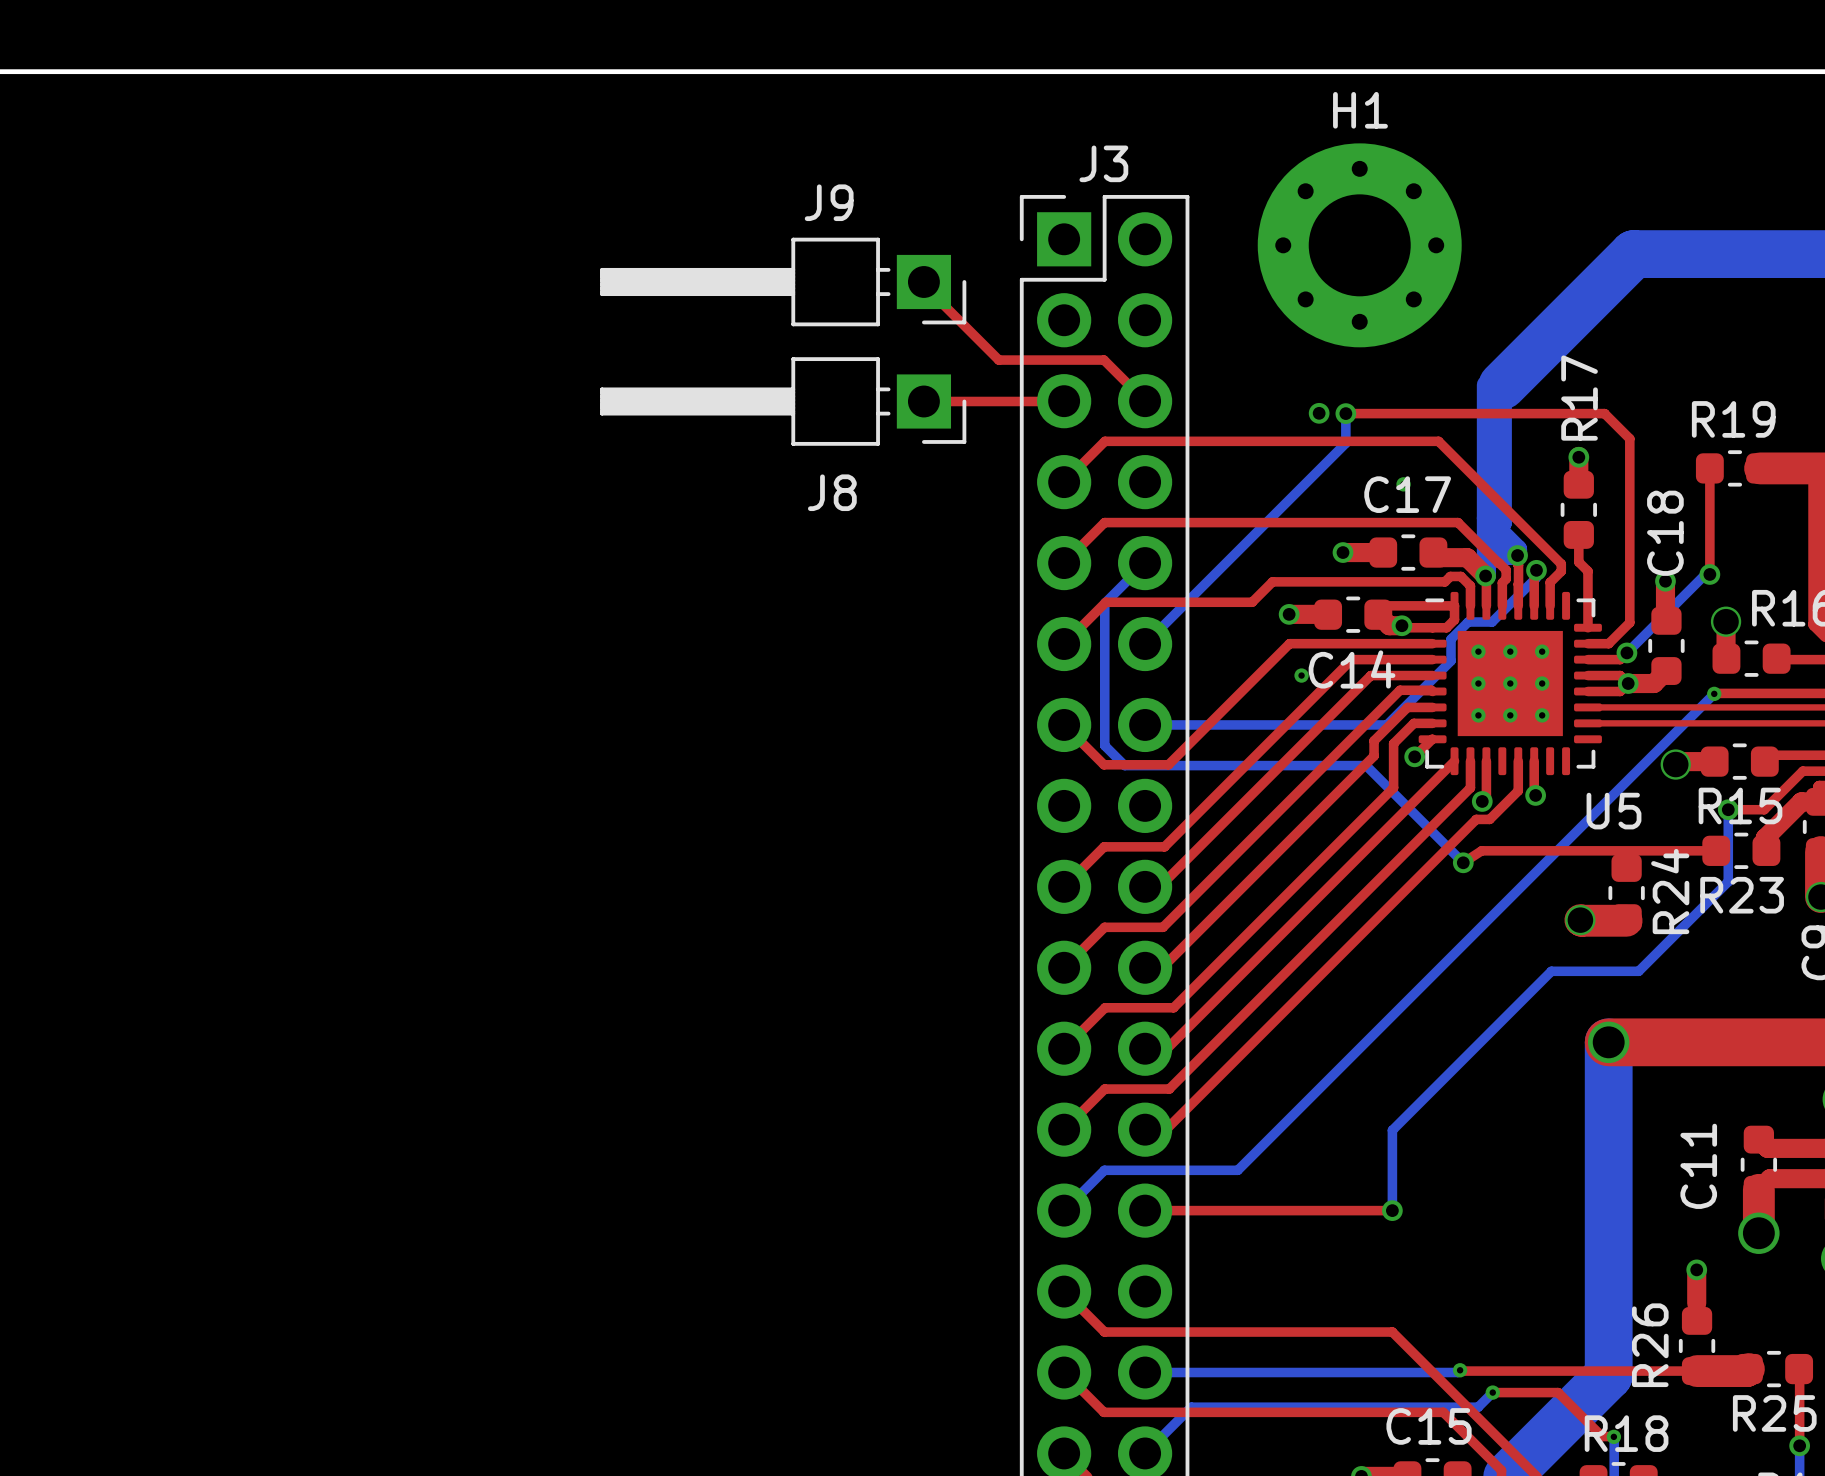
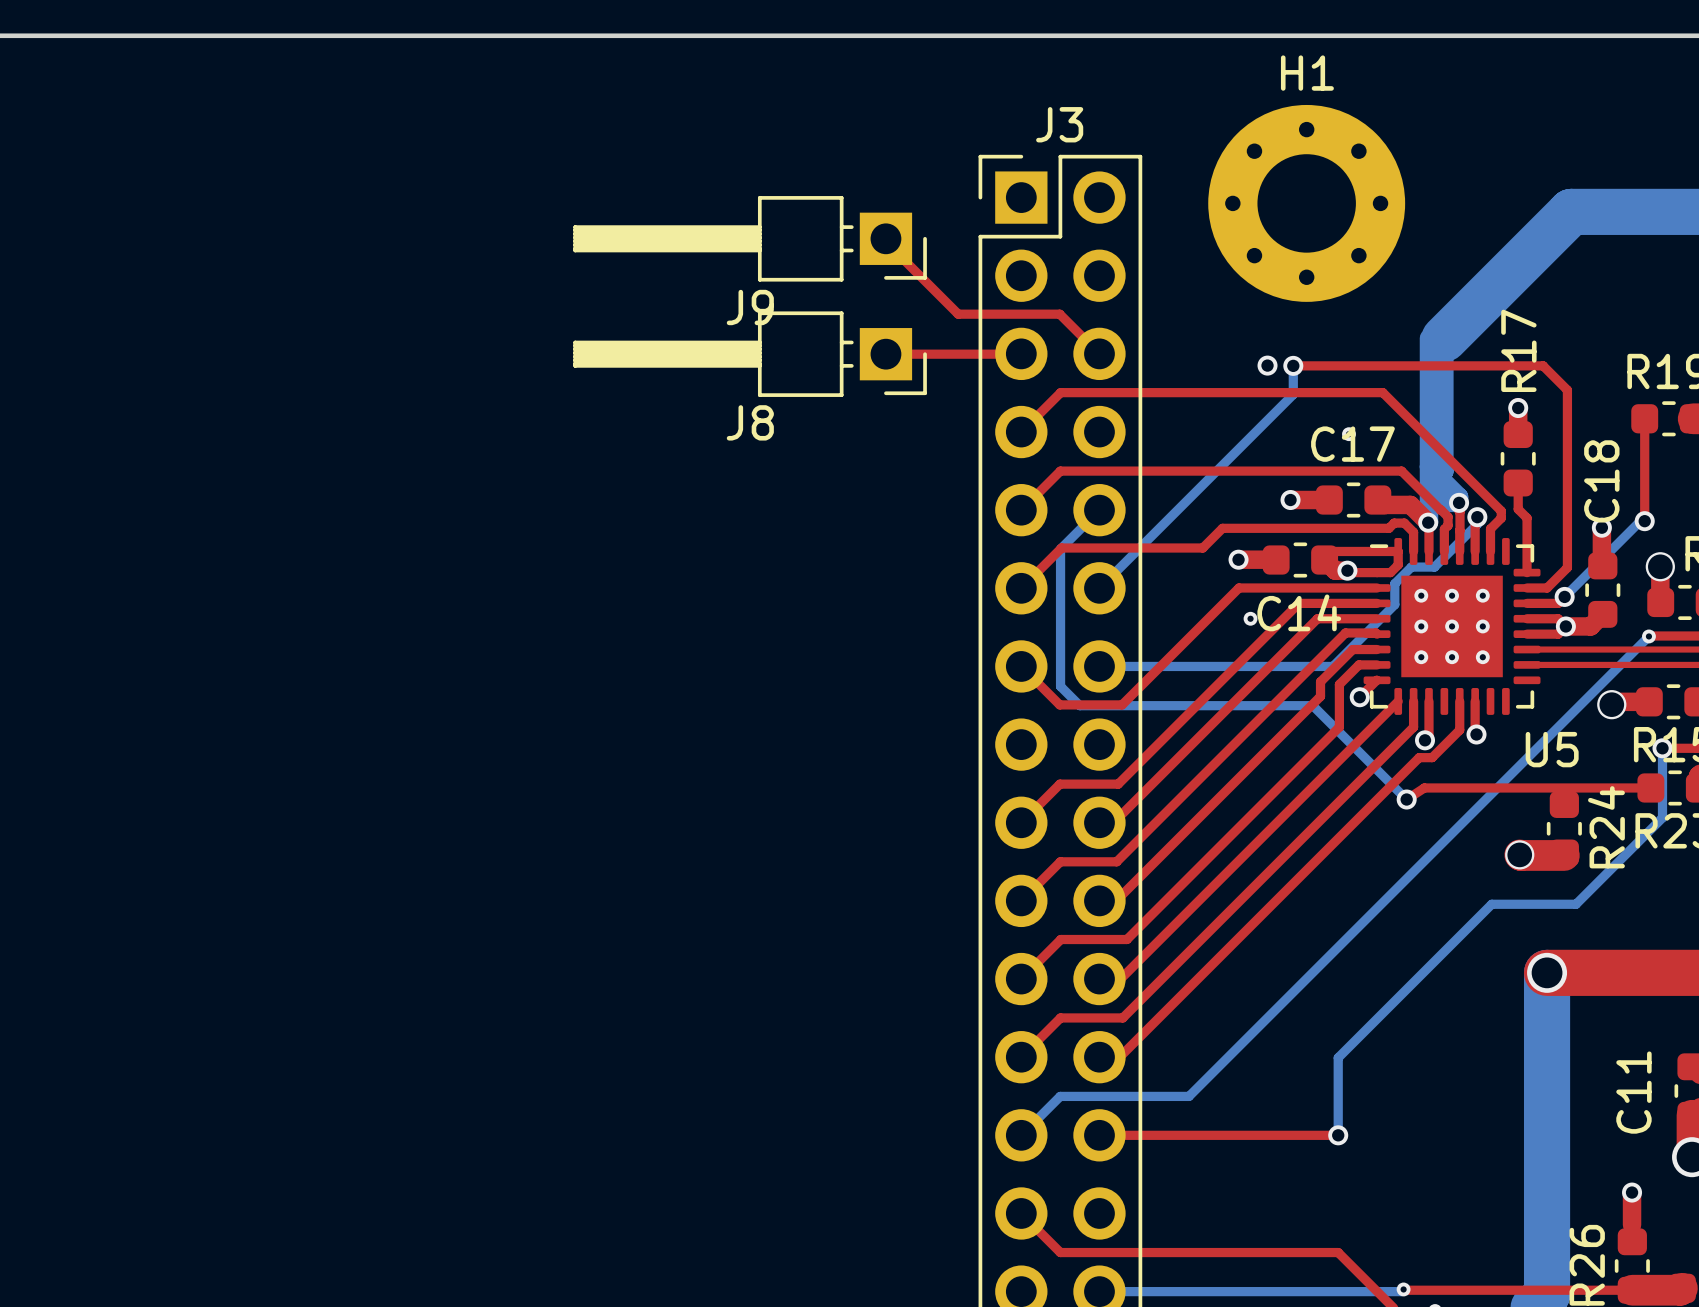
J9 name position: J9 (829, 202) -> J9 (750, 307)
J8 name position: J8 (832, 492) -> J8 (750, 422)

